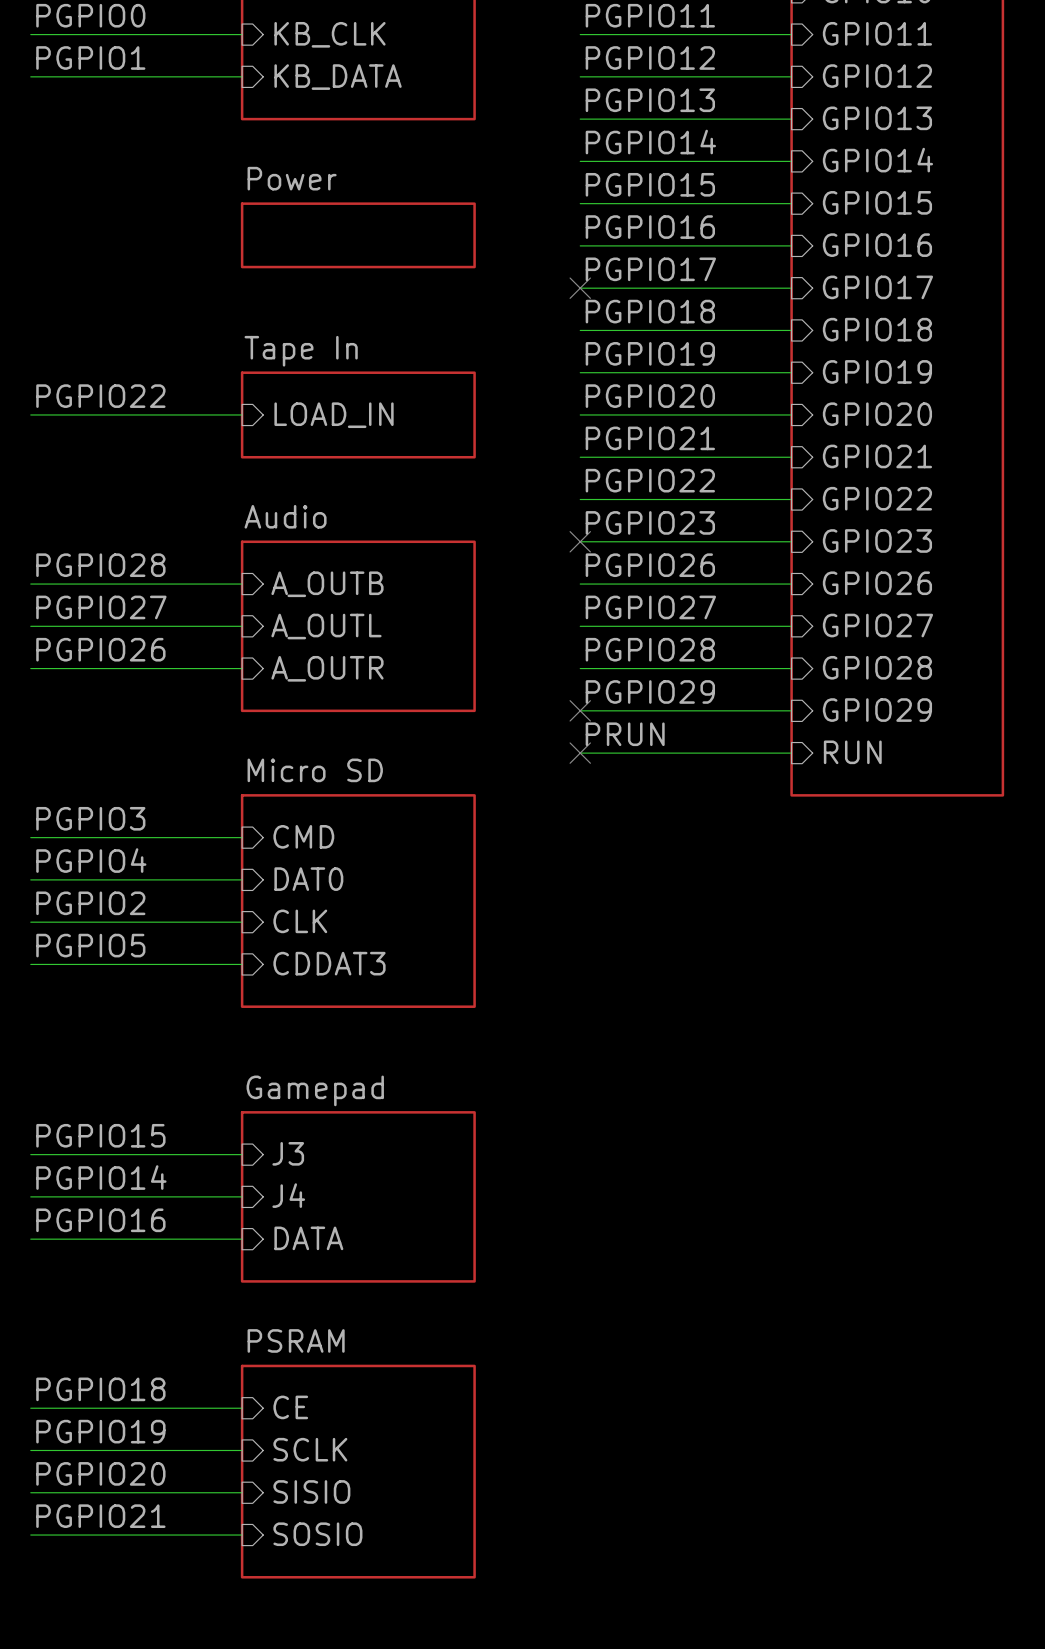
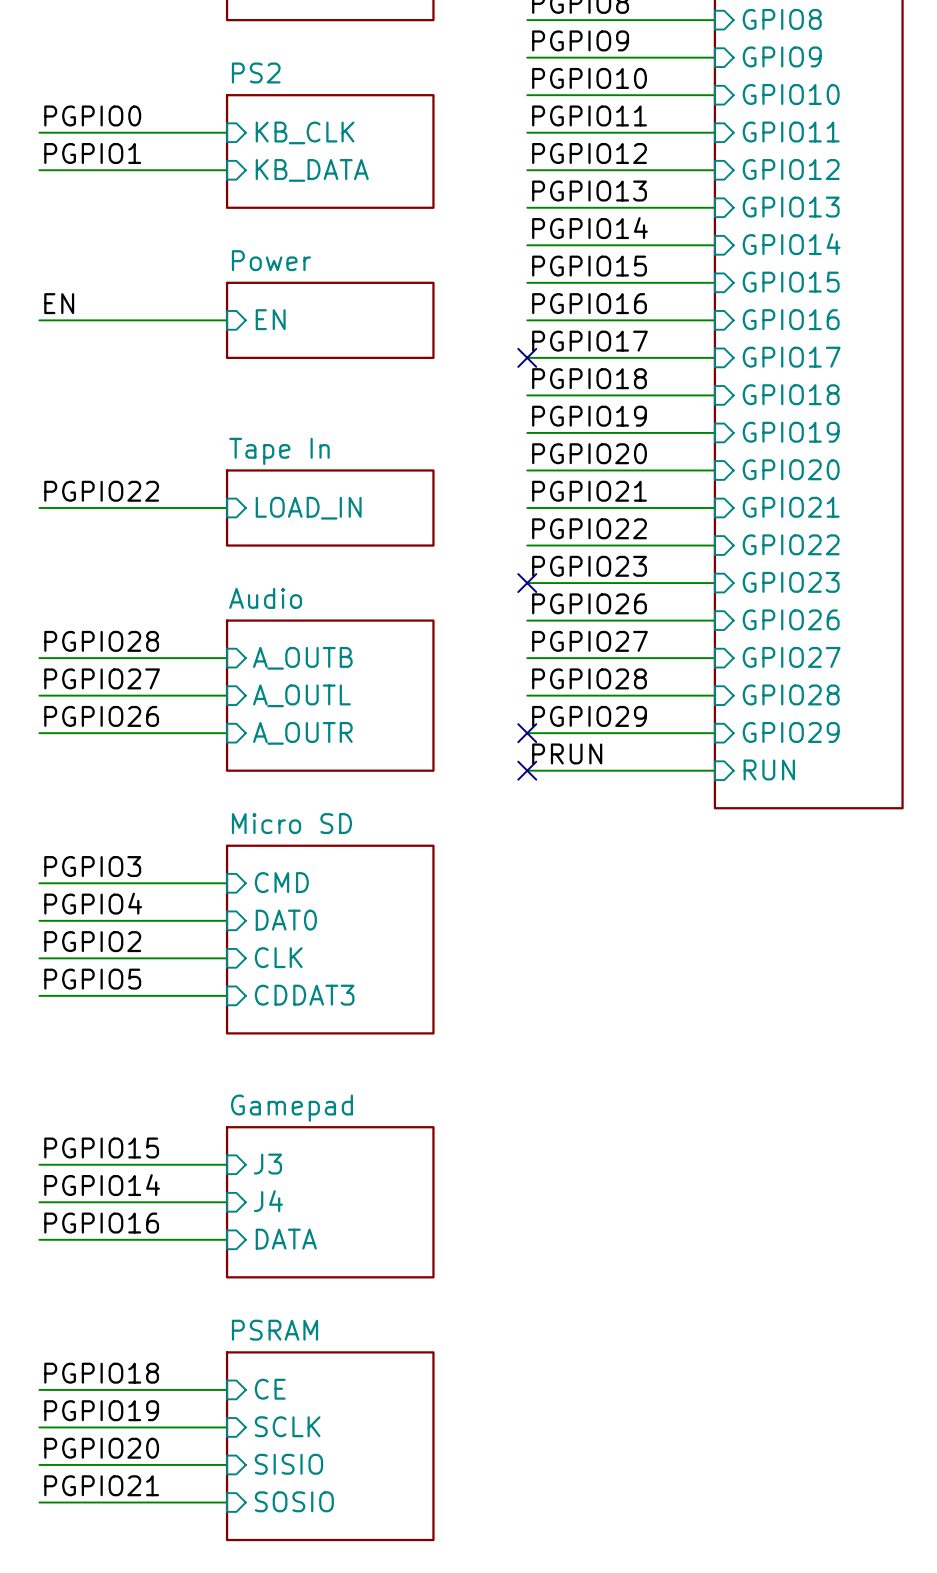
sheet Power shape: [240, 202, 476, 269] -> [225, 281, 435, 360]
label: none -> EN (59, 303)
sheet pin: none -> EN (270, 319)
label position: PGPIO22 (100, 396) -> PGPIO22 (101, 491)
wire: (30, 414) (242, 414) -> (39, 320) (227, 320)
sheet Tape In position: (358, 414) -> (330, 508)
sheet pin position: LOAD_IN (334, 415) -> LOAD_IN (308, 508)
label: PGPIO28 (100, 565) -> none
wire: (30, 584) (242, 584) -> (39, 508) (227, 508)
sheet pin: A_OUTB (327, 584) -> none
label: PGPIO27 (101, 607) -> PGPIO28 (101, 641)
sheet pin: A_OUTL (326, 626) -> A_OUTB (302, 658)
sheet Audio position: (358, 626) -> (330, 695)
label: PGPIO26 (100, 649) -> PGPIO27 (102, 678)
sheet pin: A_OUTR (327, 668) -> A_OUTL (301, 695)
label: none -> PGPIO26 (101, 716)
sheet pin: none -> A_OUTR (302, 733)
label: PGPIO3 (90, 818) -> none
sheet pin: CMD (303, 836) -> none
wire: (30, 837) (242, 837) -> (39, 733) (227, 733)
label: PGPIO4 (91, 860) -> PGPIO3 (92, 866)
sheet pin: DAT0 (308, 879) -> CMD (281, 882)
sheet Micro SD position: (358, 901) -> (330, 939)
label: PGPIO2 (90, 903) -> PGPIO4 (93, 903)
sheet pin: CLK (300, 921) -> DAT0 (286, 920)
label: PGPIO5 (90, 945) -> PGPIO2 (92, 941)
sheet pin: CDDAT3 (329, 963) -> CLK (278, 957)
label: none -> PGPIO5 (92, 979)
sheet pin: none -> CDDAT3 (304, 995)
label: PGPIO15 (100, 1135) -> none
sheet pin: J3 (288, 1153) -> none
wire: (30, 1154) (242, 1154) -> (39, 995) (227, 995)
label: PGPIO14 (101, 1177) -> PGPIO15 (101, 1148)
sheet pin: J4 (288, 1195) -> J3 (268, 1164)
sheet Gamepad position: (358, 1196) -> (330, 1202)
label: PGPIO16 (100, 1220) -> PGPIO14 (102, 1185)
sheet pin: DATA (308, 1238) -> J4 (268, 1201)
label: none -> PGPIO16 (101, 1223)
sheet pin: none -> DATA (286, 1239)
label: PGPIO18 (100, 1389) -> none
sheet pin: CE (290, 1407) -> none
wire: (30, 1408) (242, 1408) -> (39, 1239) (227, 1239)
label: PGPIO19 (100, 1431) -> PGPIO18 (101, 1373)
sheet pin: SCLK (310, 1449) -> CE (270, 1389)
sheet PSRAM position: (358, 1471) -> (330, 1446)
label: PGPIO20 (100, 1473) -> PGPIO19 (101, 1410)
sheet pin: SISIO (311, 1491) -> SCLK (287, 1426)
label: PGPIO21 (100, 1516) -> PGPIO20 (101, 1448)
sheet pin: SOSIO (317, 1534) -> SISIO (288, 1464)
label: none -> PGPIO21 (101, 1485)
sheet pin: none -> SOSIO (294, 1501)
wire: none -> (39, 1502) (227, 1502)

